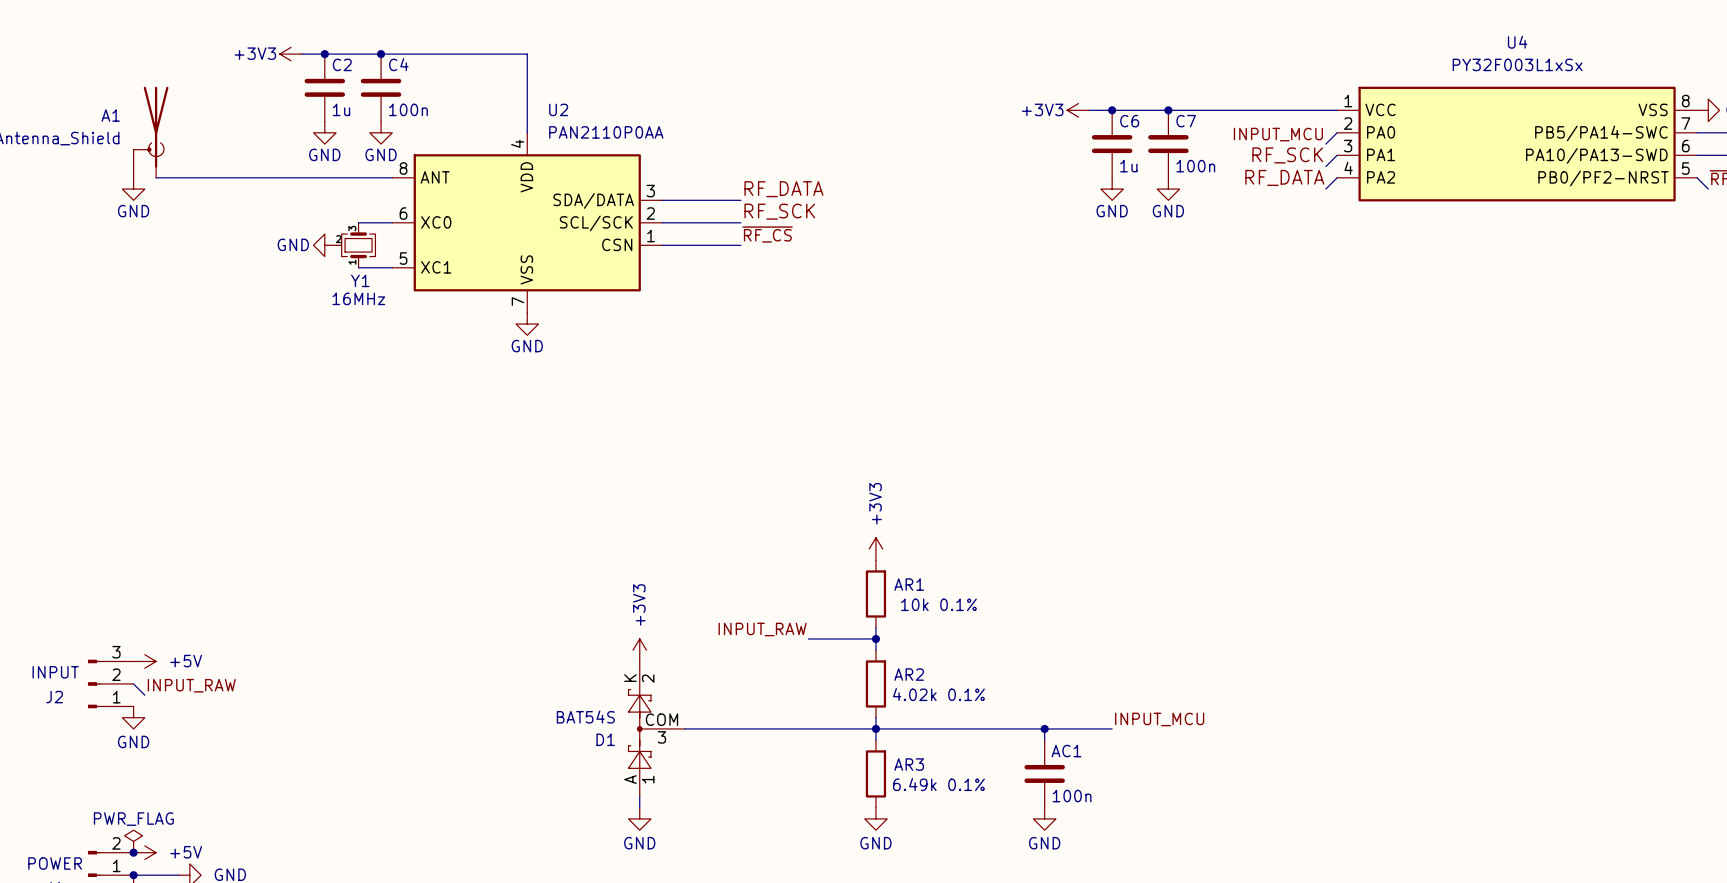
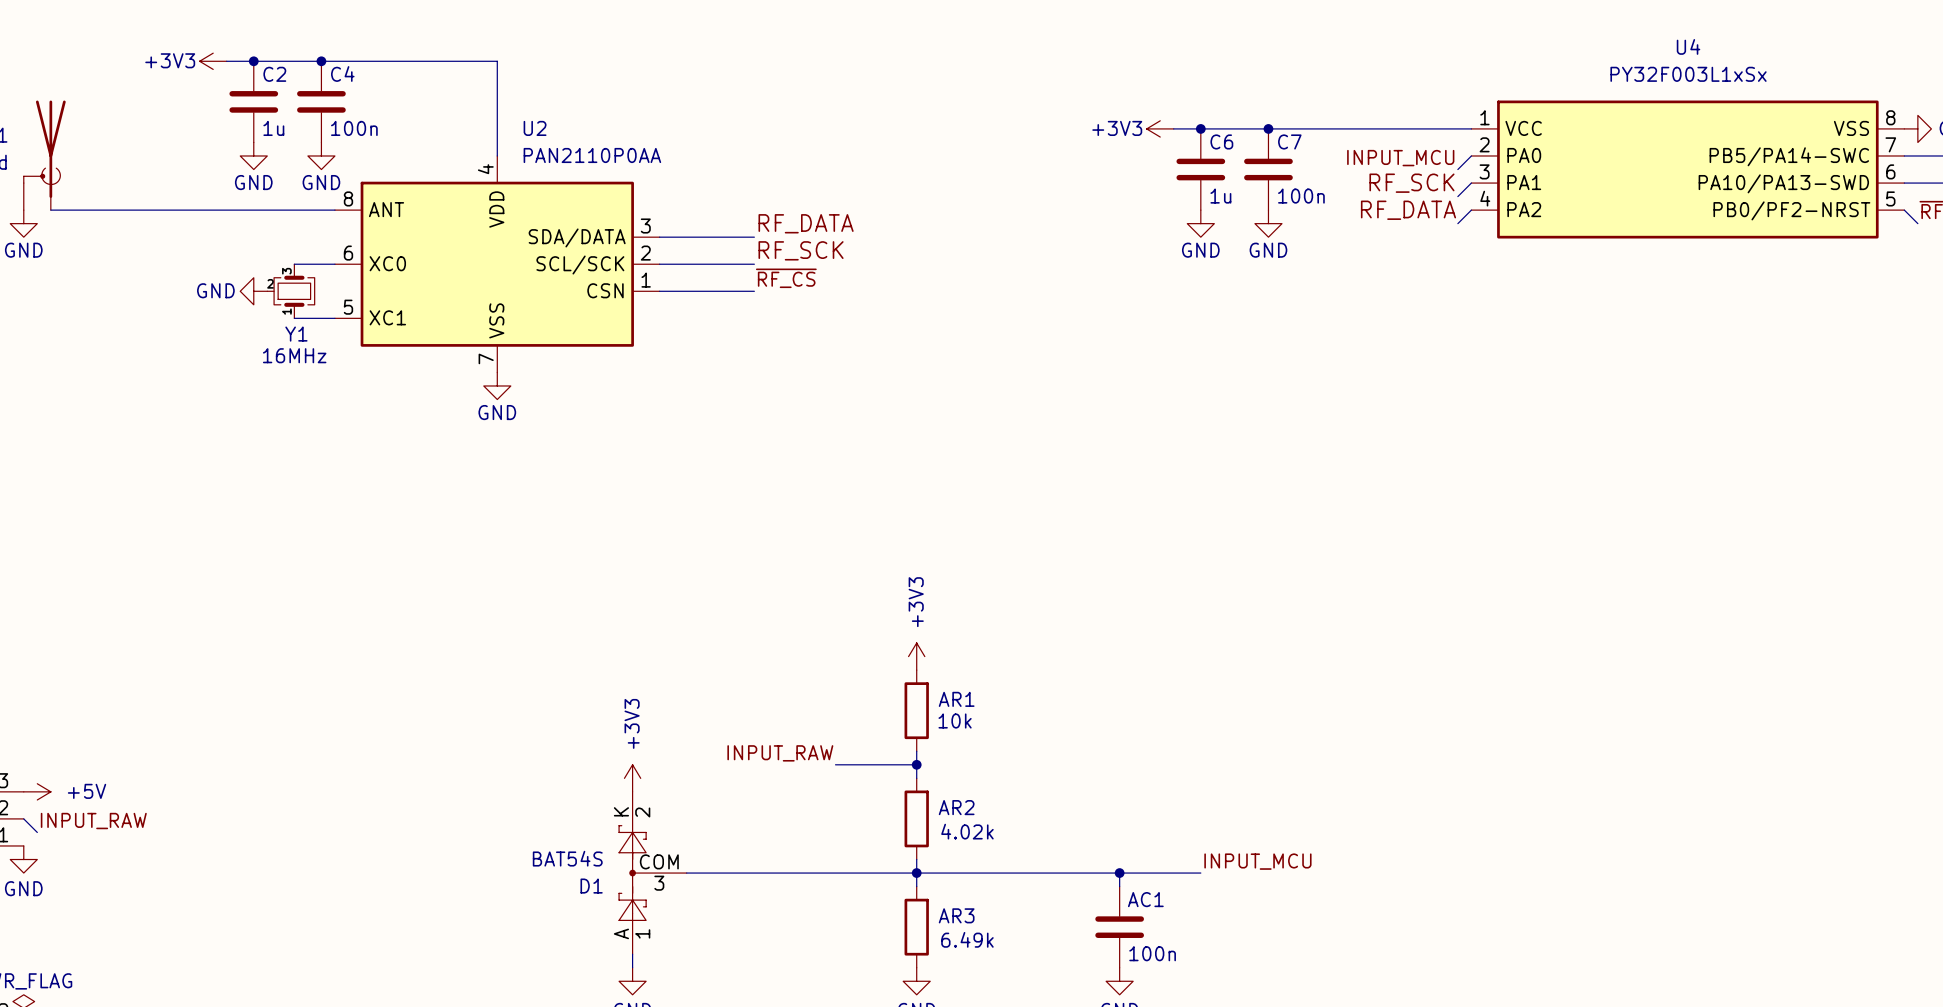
AR1 value: 10k 0.1% (938, 604) -> 10k (955, 721)
AR2 value: 4.02k 0.1% (938, 694) -> 4.02k (967, 831)
AR3 value: 6.49k 0.1% (938, 784) -> 6.49k (967, 939)

